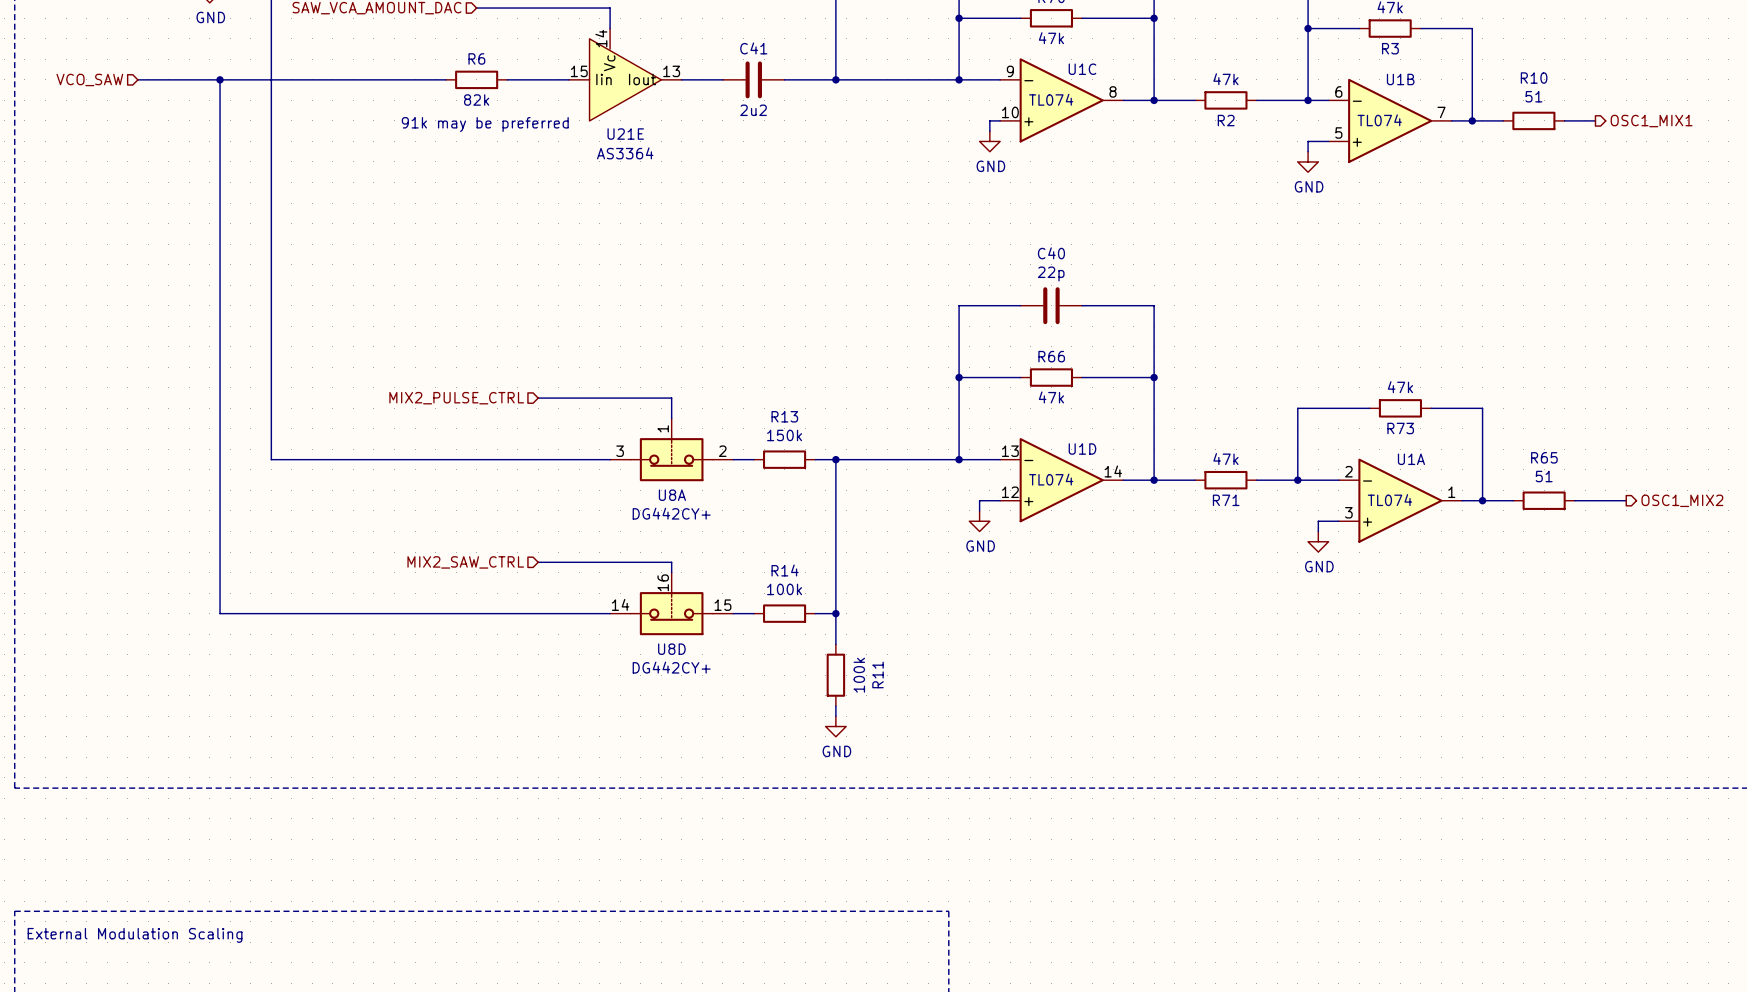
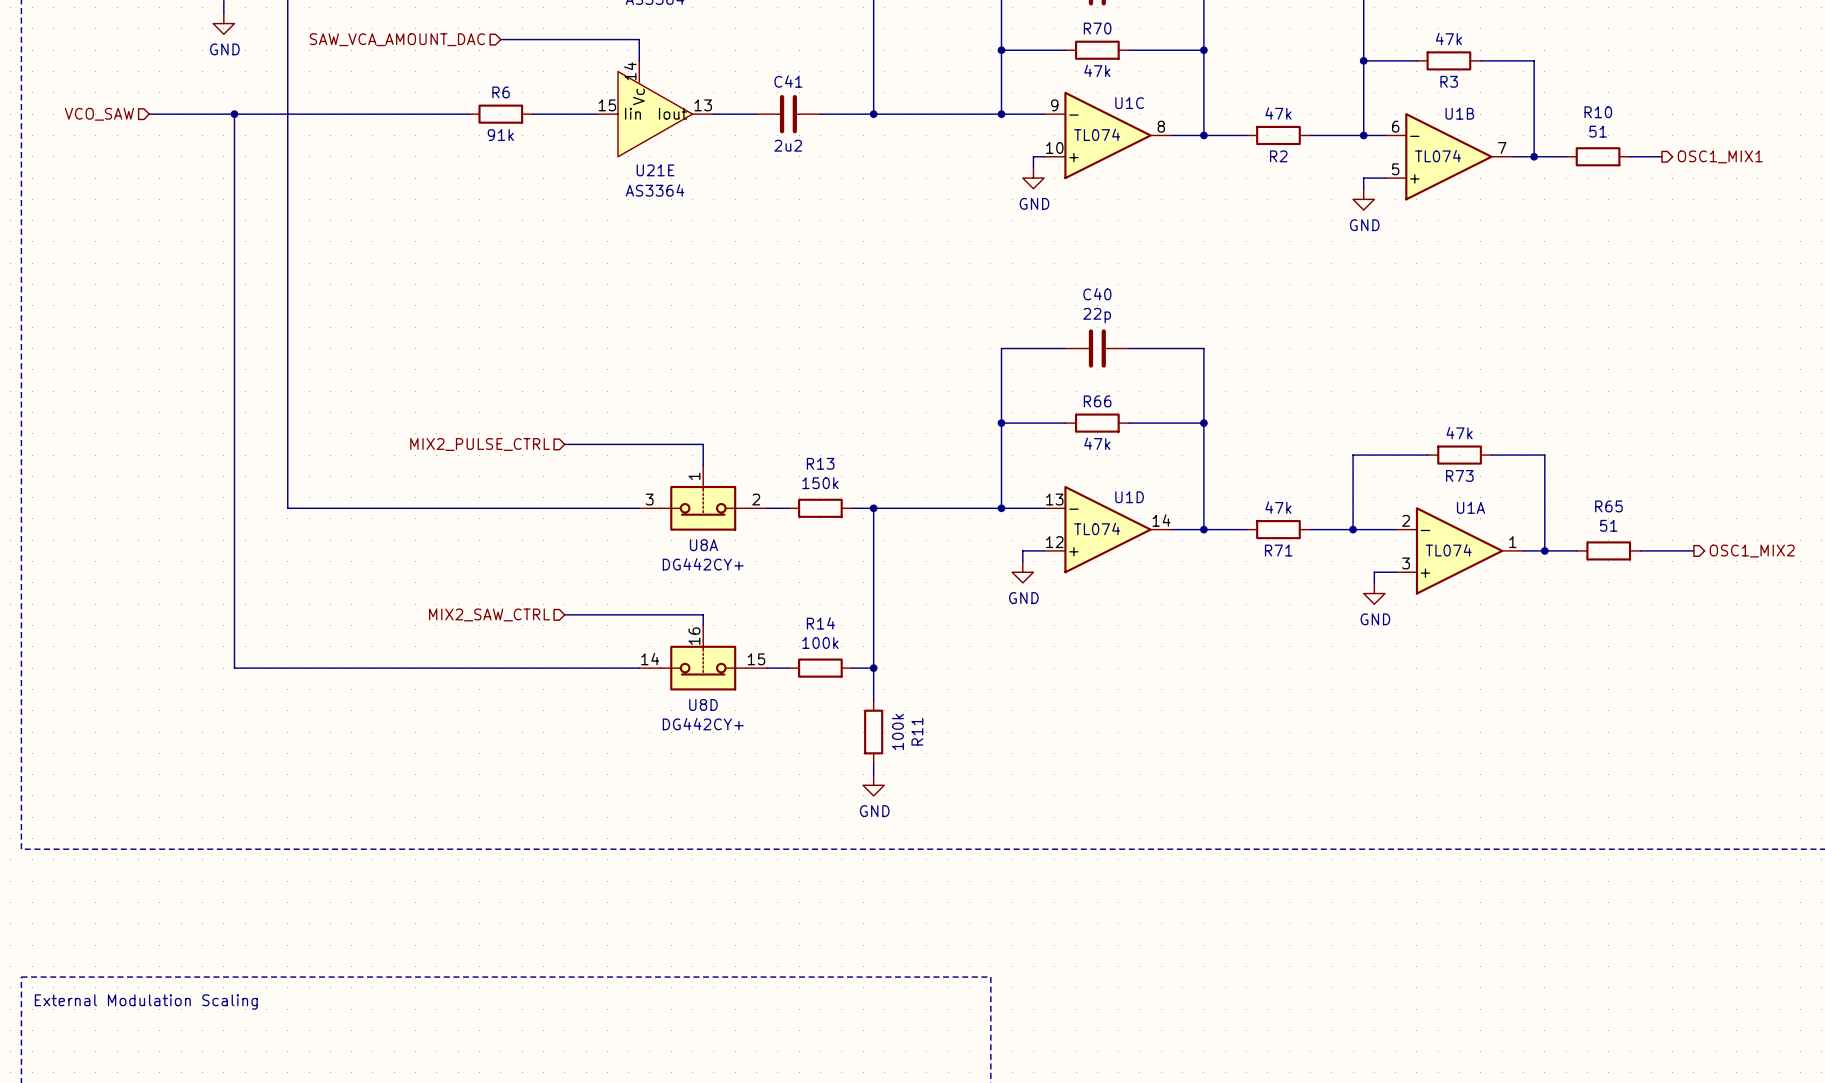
R6 value: 82k (476, 100) -> 91k (500, 135)
text: 91k may be preferred (485, 124) -> none

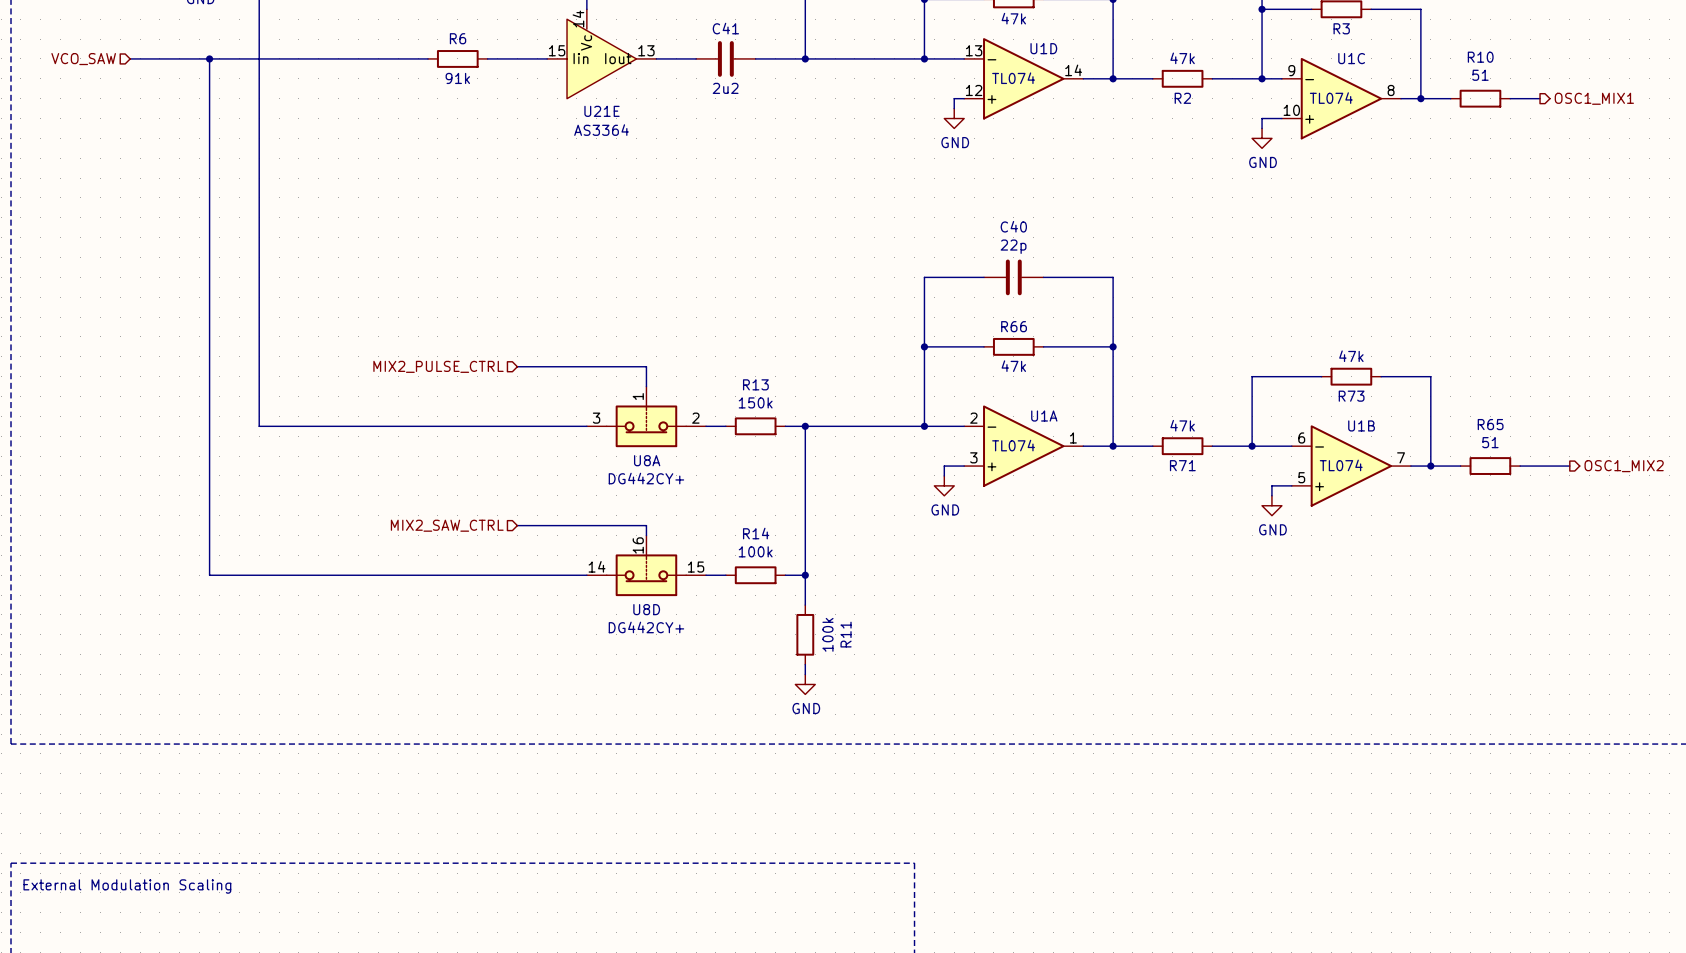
U1C name position: U1C (1129, 103) -> U1C (1351, 58)
U1C position: (1108, 135) -> (1341, 98)
U1B position: (1448, 156) -> (1351, 466)
U1A name position: U1A (1470, 507) -> U1A (1044, 416)
U1D position: (1108, 529) -> (1023, 78)
U1A position: (1459, 550) -> (1023, 446)

